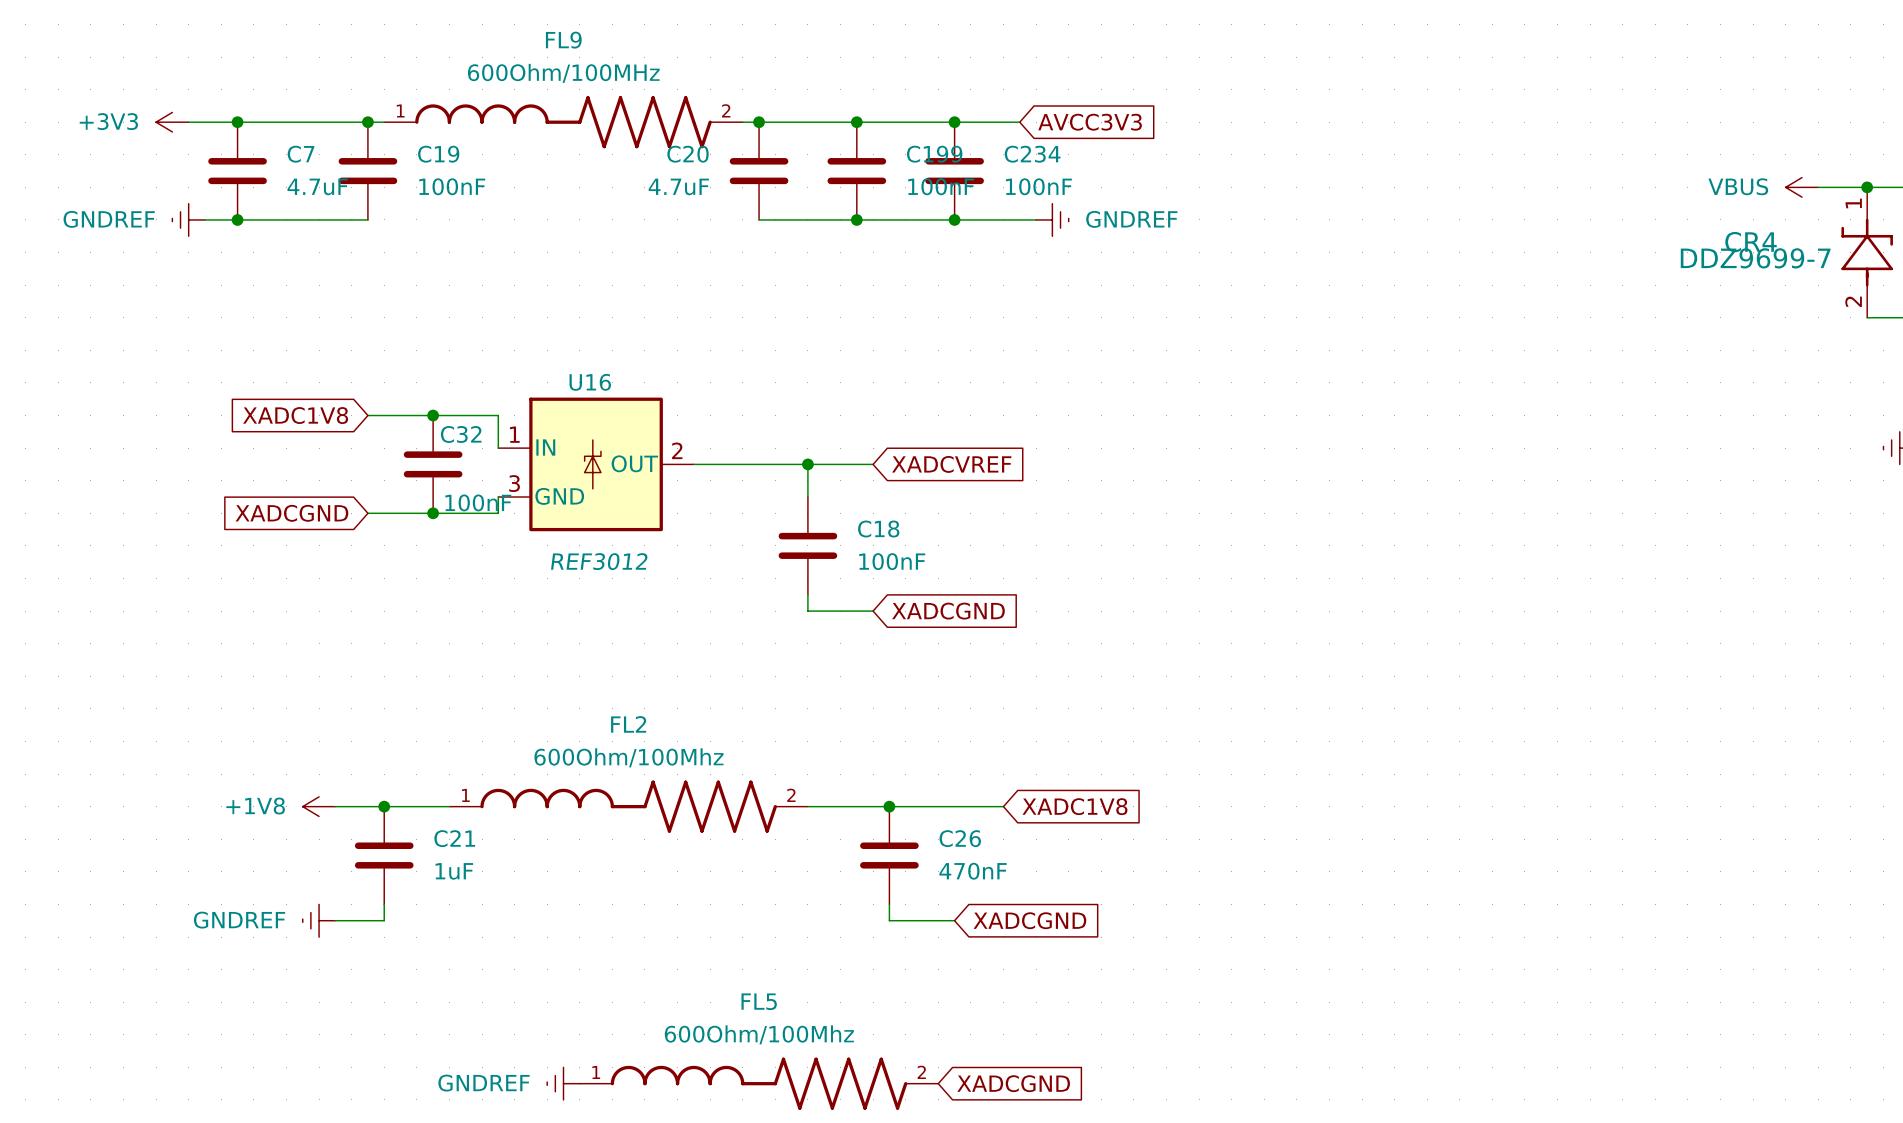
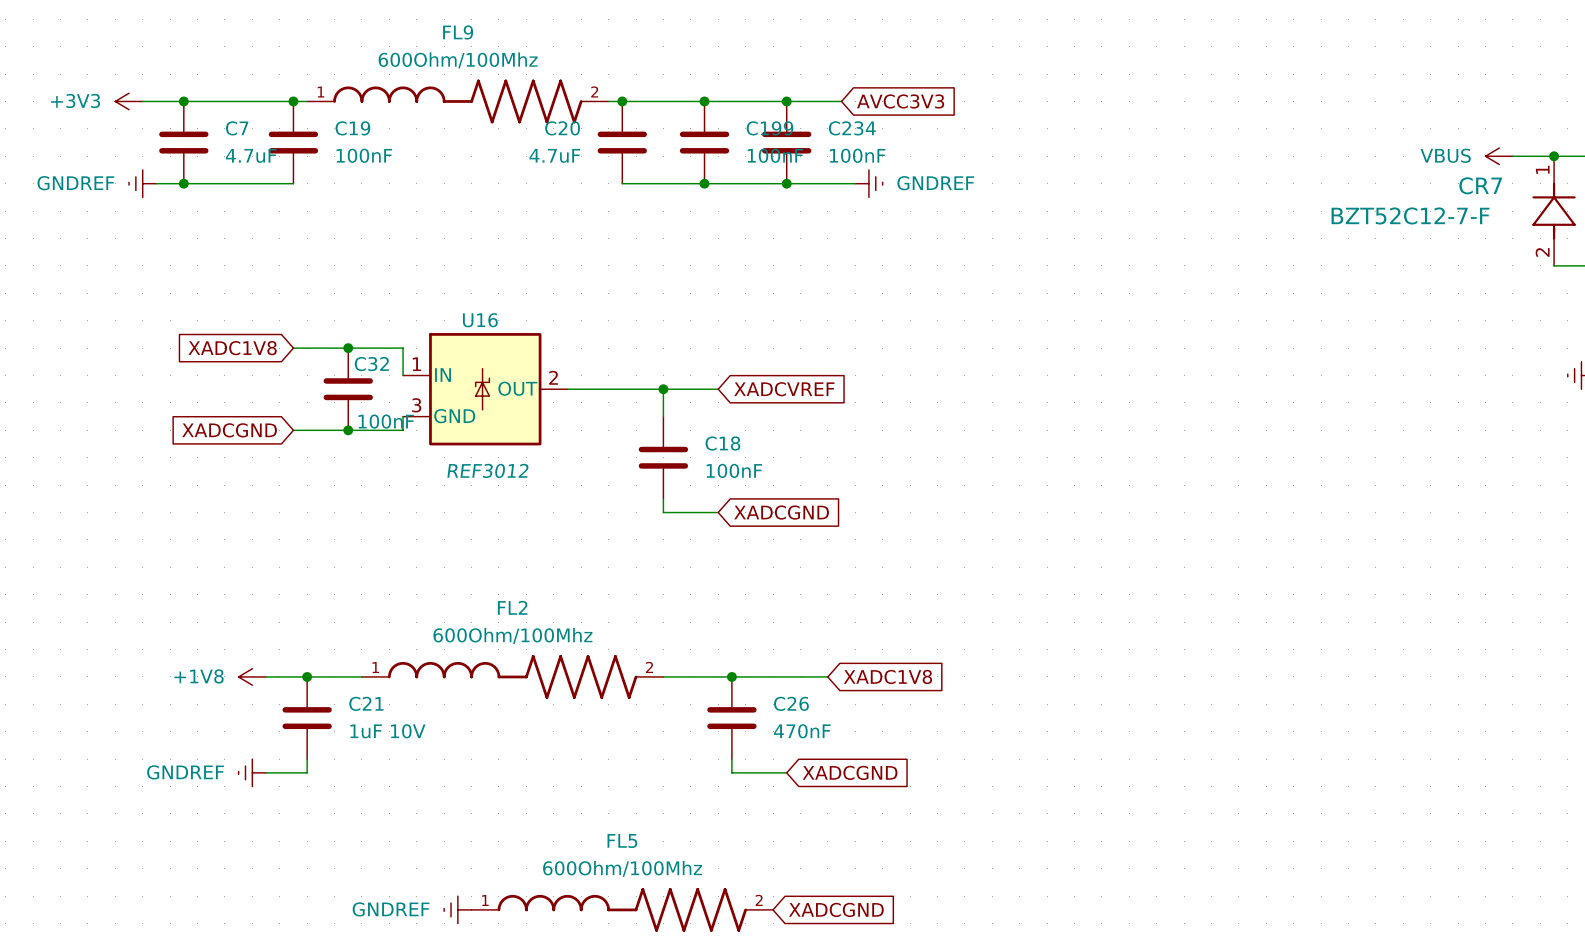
FL9 value: 600Ohm/100MHz (563, 73) -> 600Ohm/100Mhz (458, 60)
CR4: DDZ9699-7 (1867, 252) -> none
CR7: none -> BZT52C12-7-F (1554, 211)
C21 value: 1uF (454, 871) -> 1uF 10V (387, 731)

